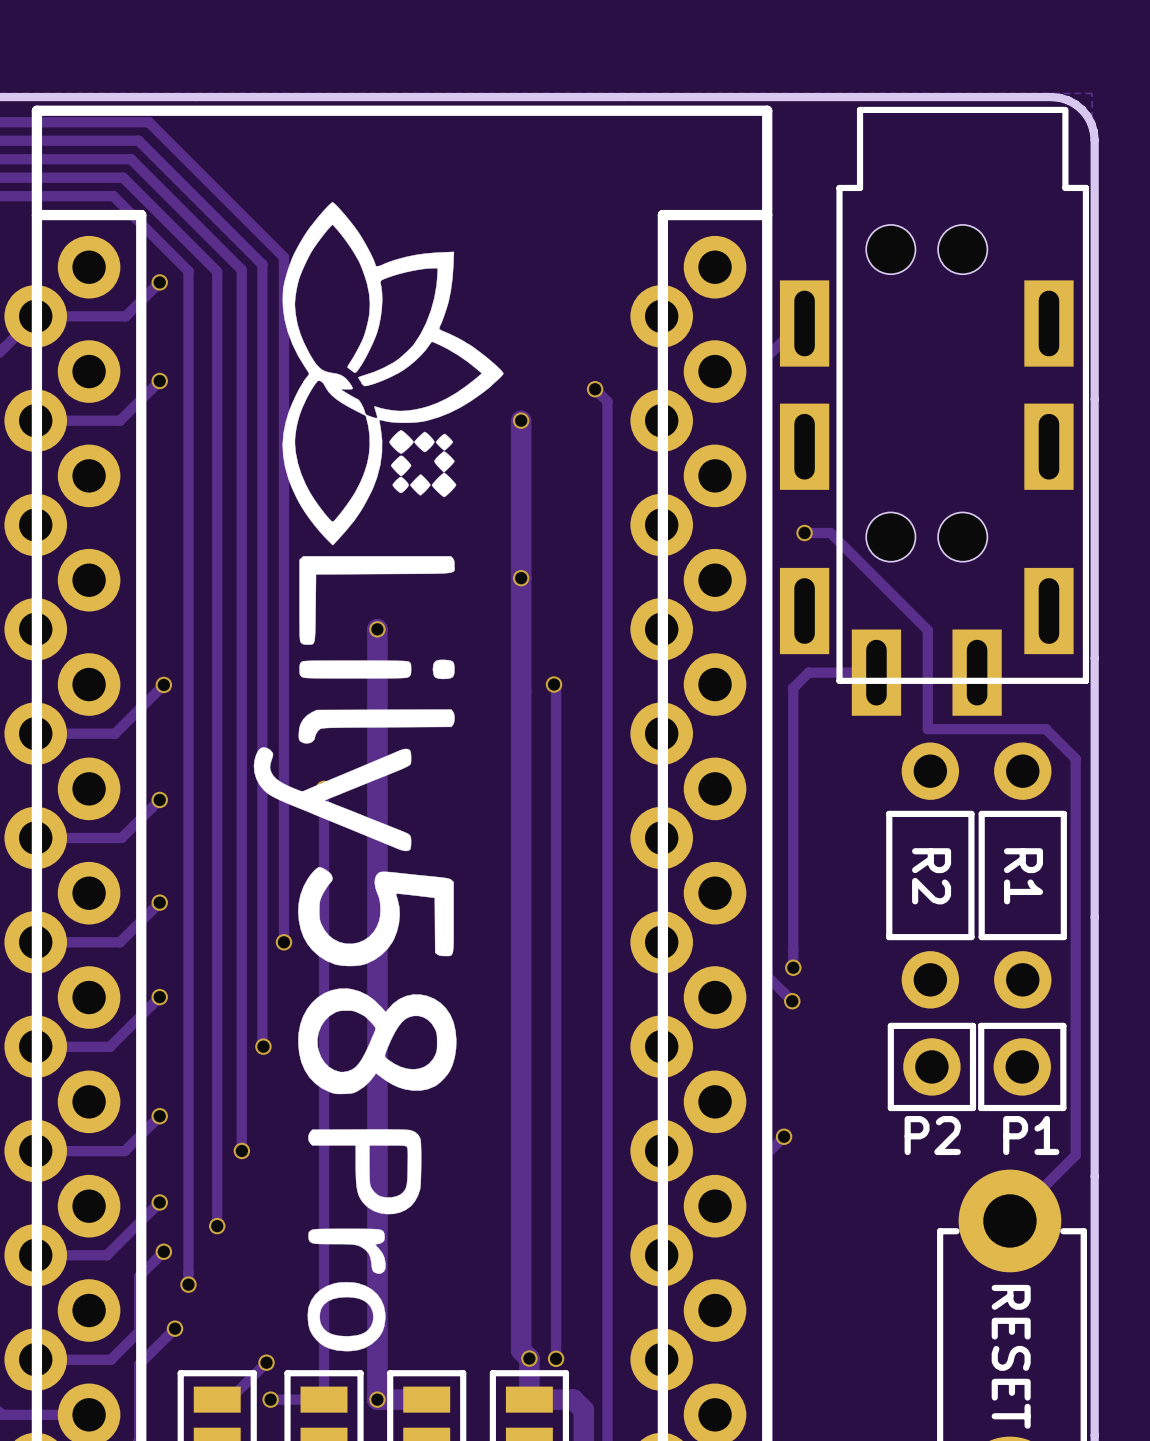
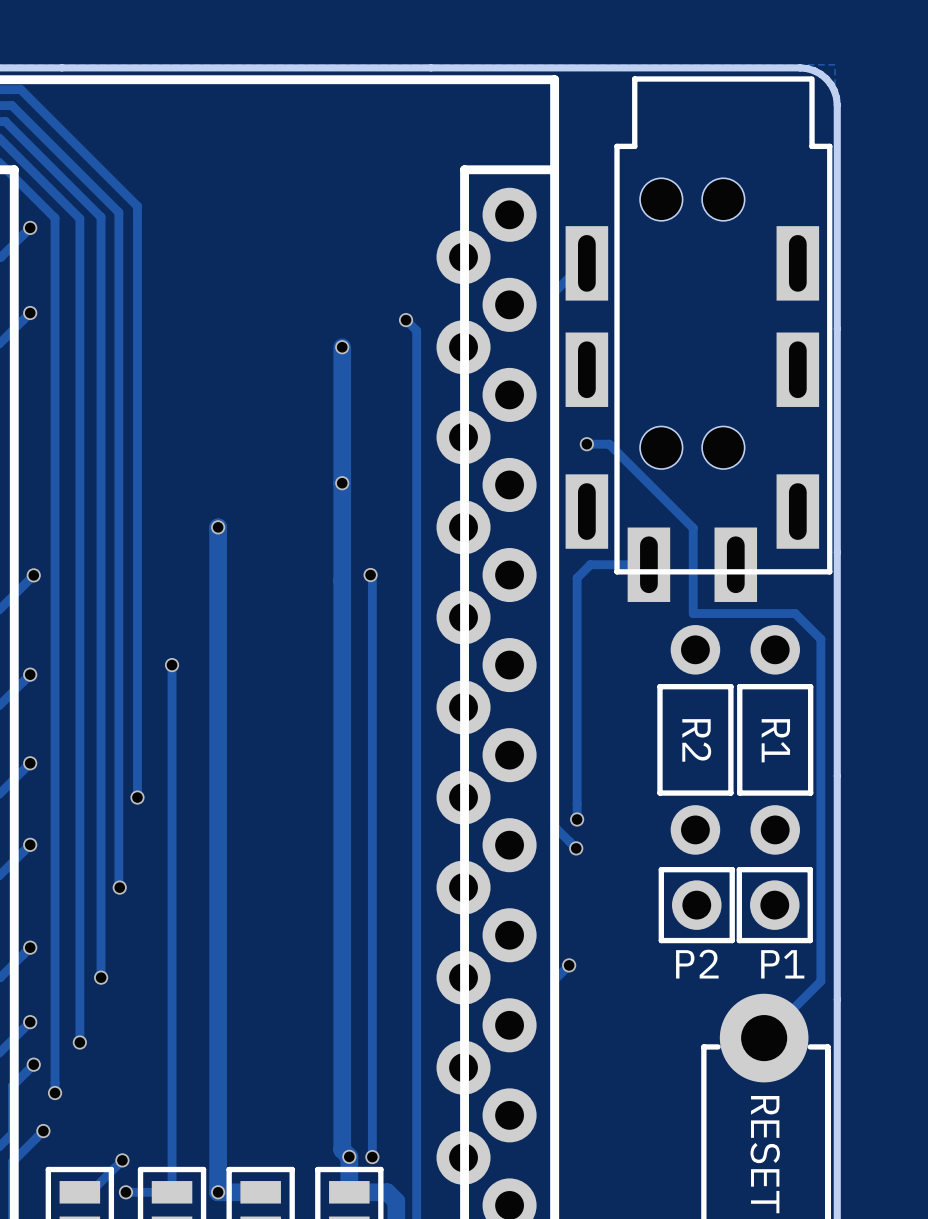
drawing: [253, 202, 504, 1352] -> none

